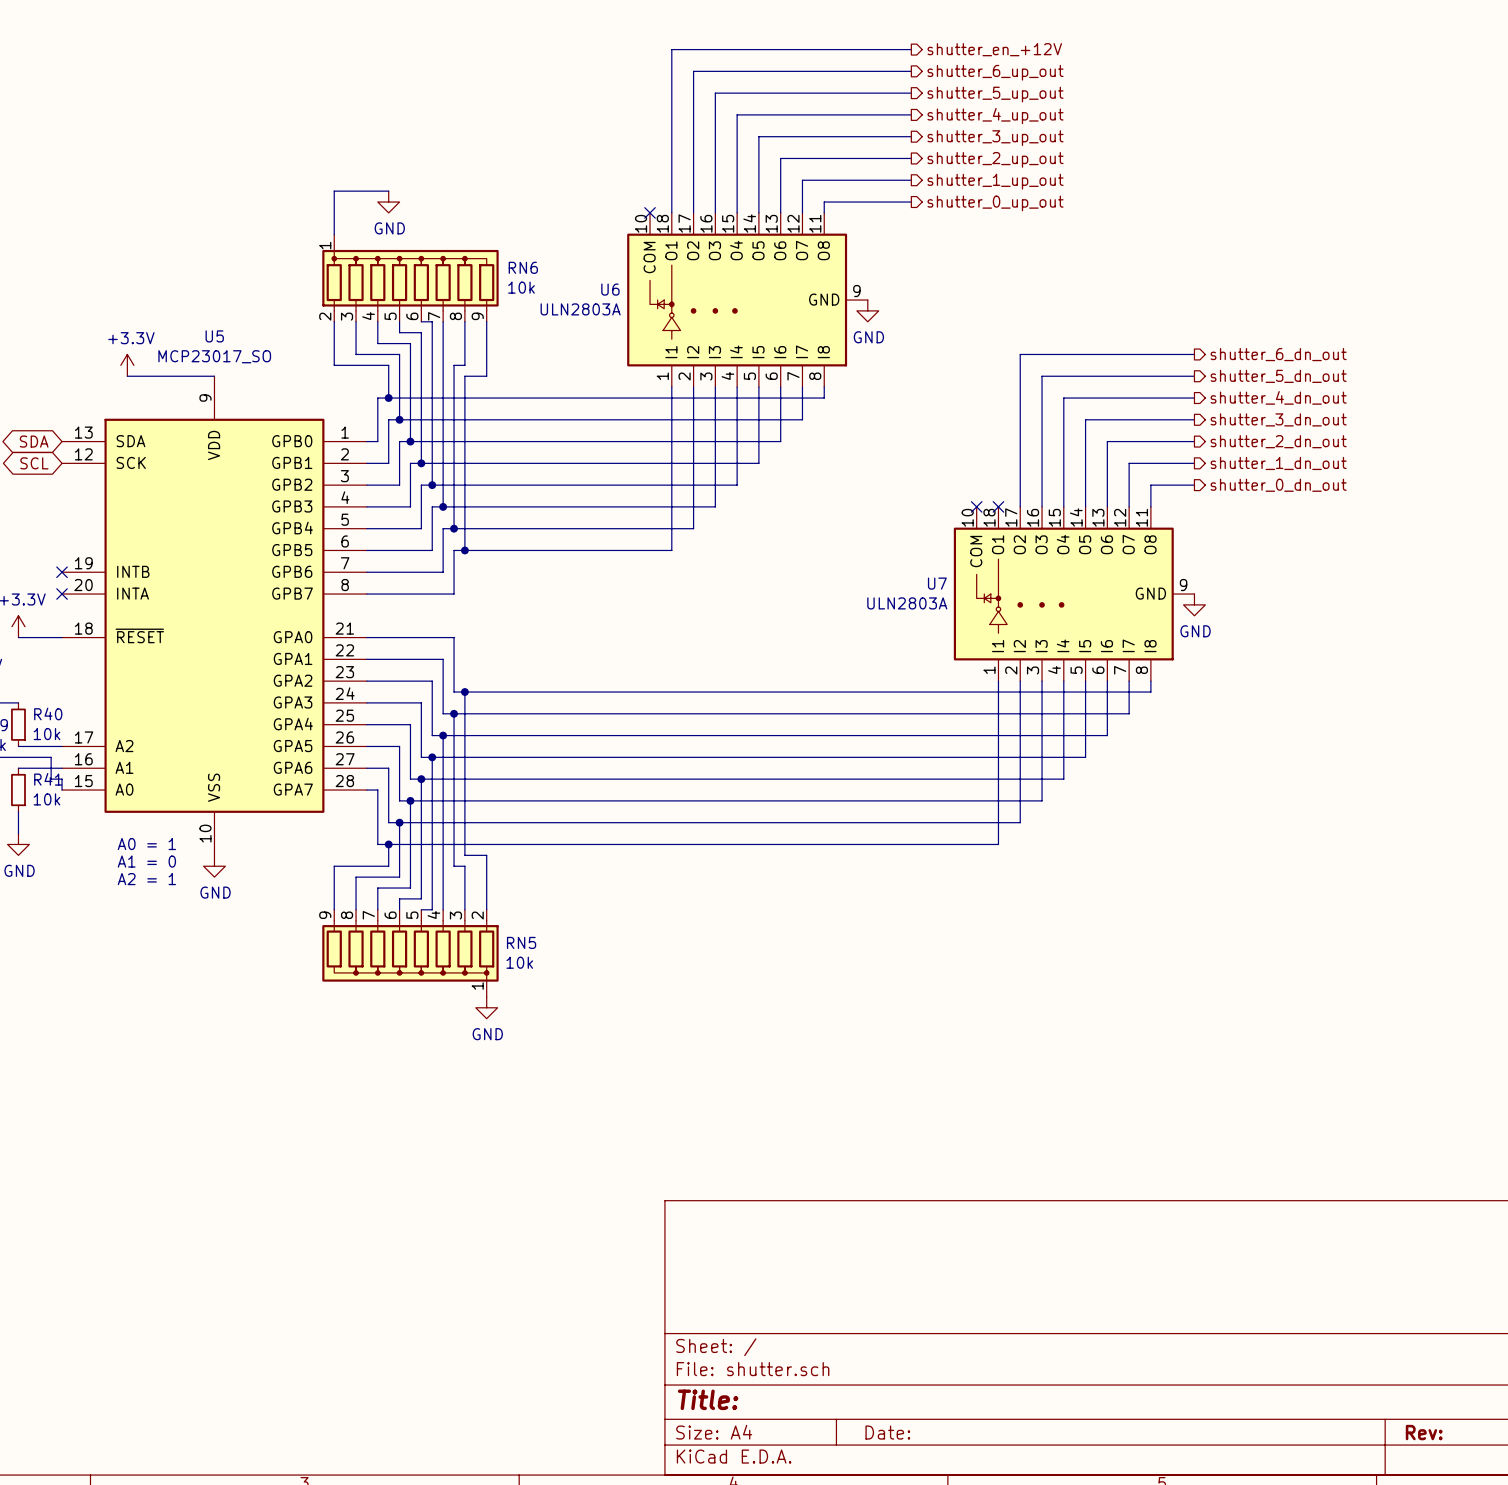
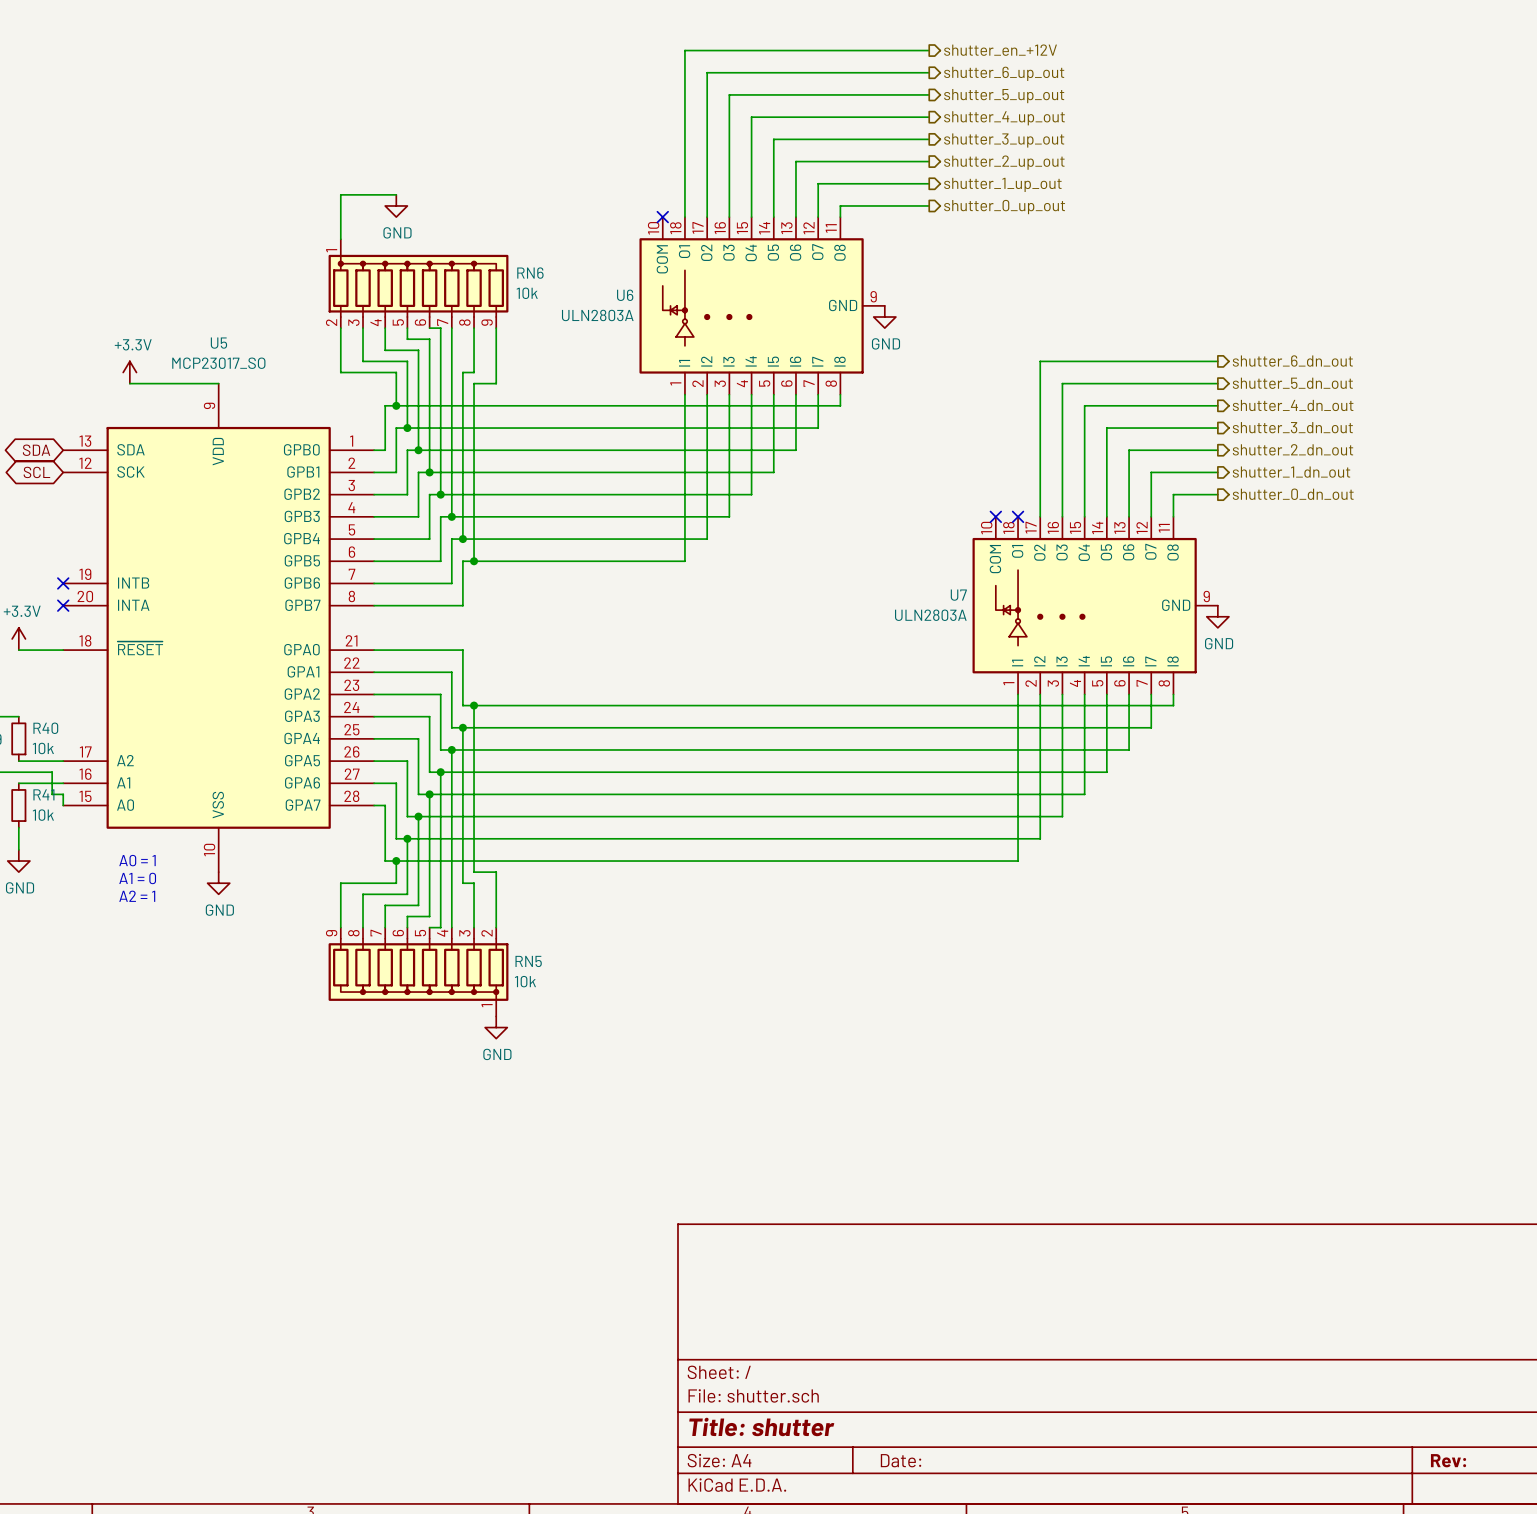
title block: Title: (708, 1399) -> Title: shutter (761, 1426)

